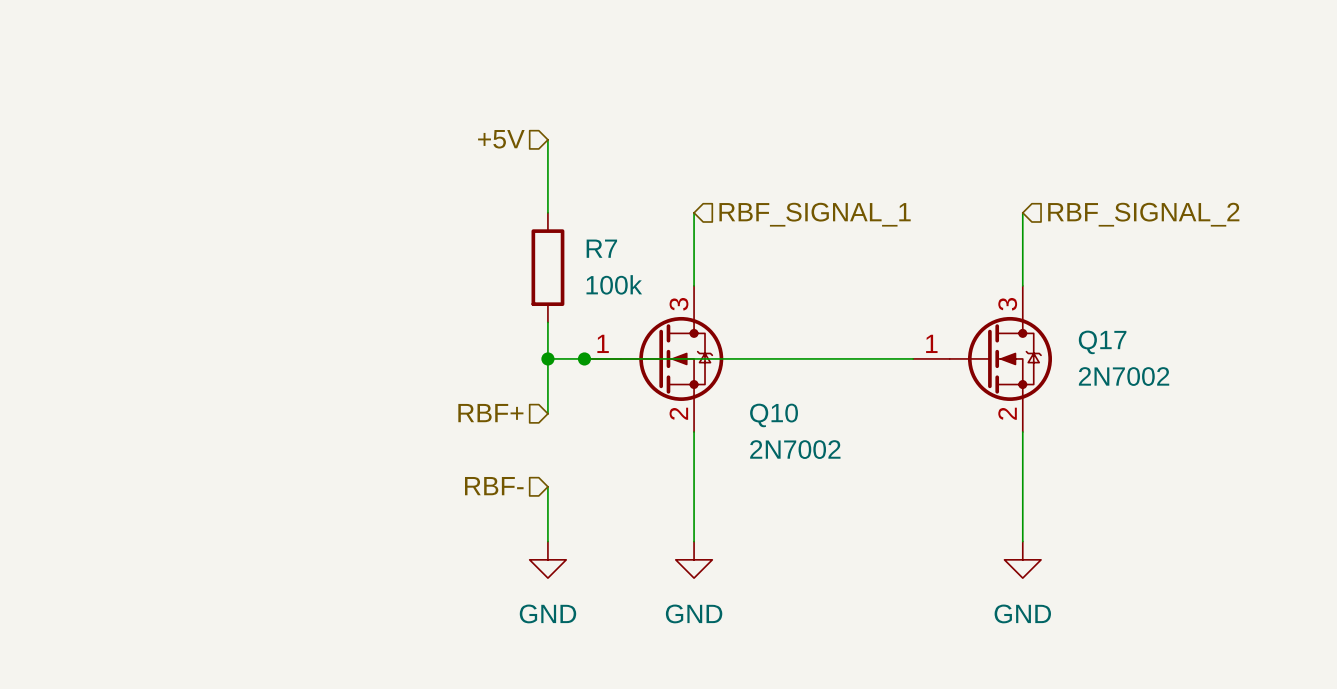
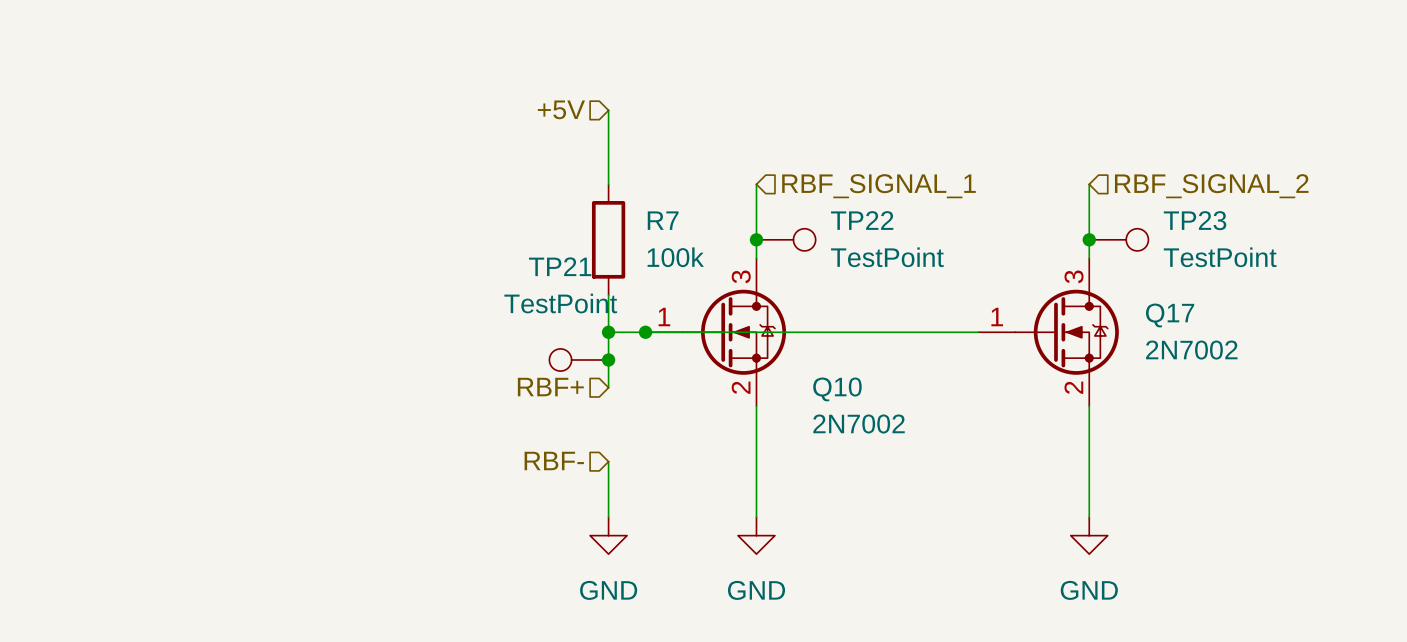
junction: none -> (756, 239)
TP22: none -> TestPoint (786, 239)
junction: none -> (1089, 239)
TP23: none -> TestPoint (1118, 239)
TP21: none -> TestPoint (579, 360)
junction: none -> (608, 360)

